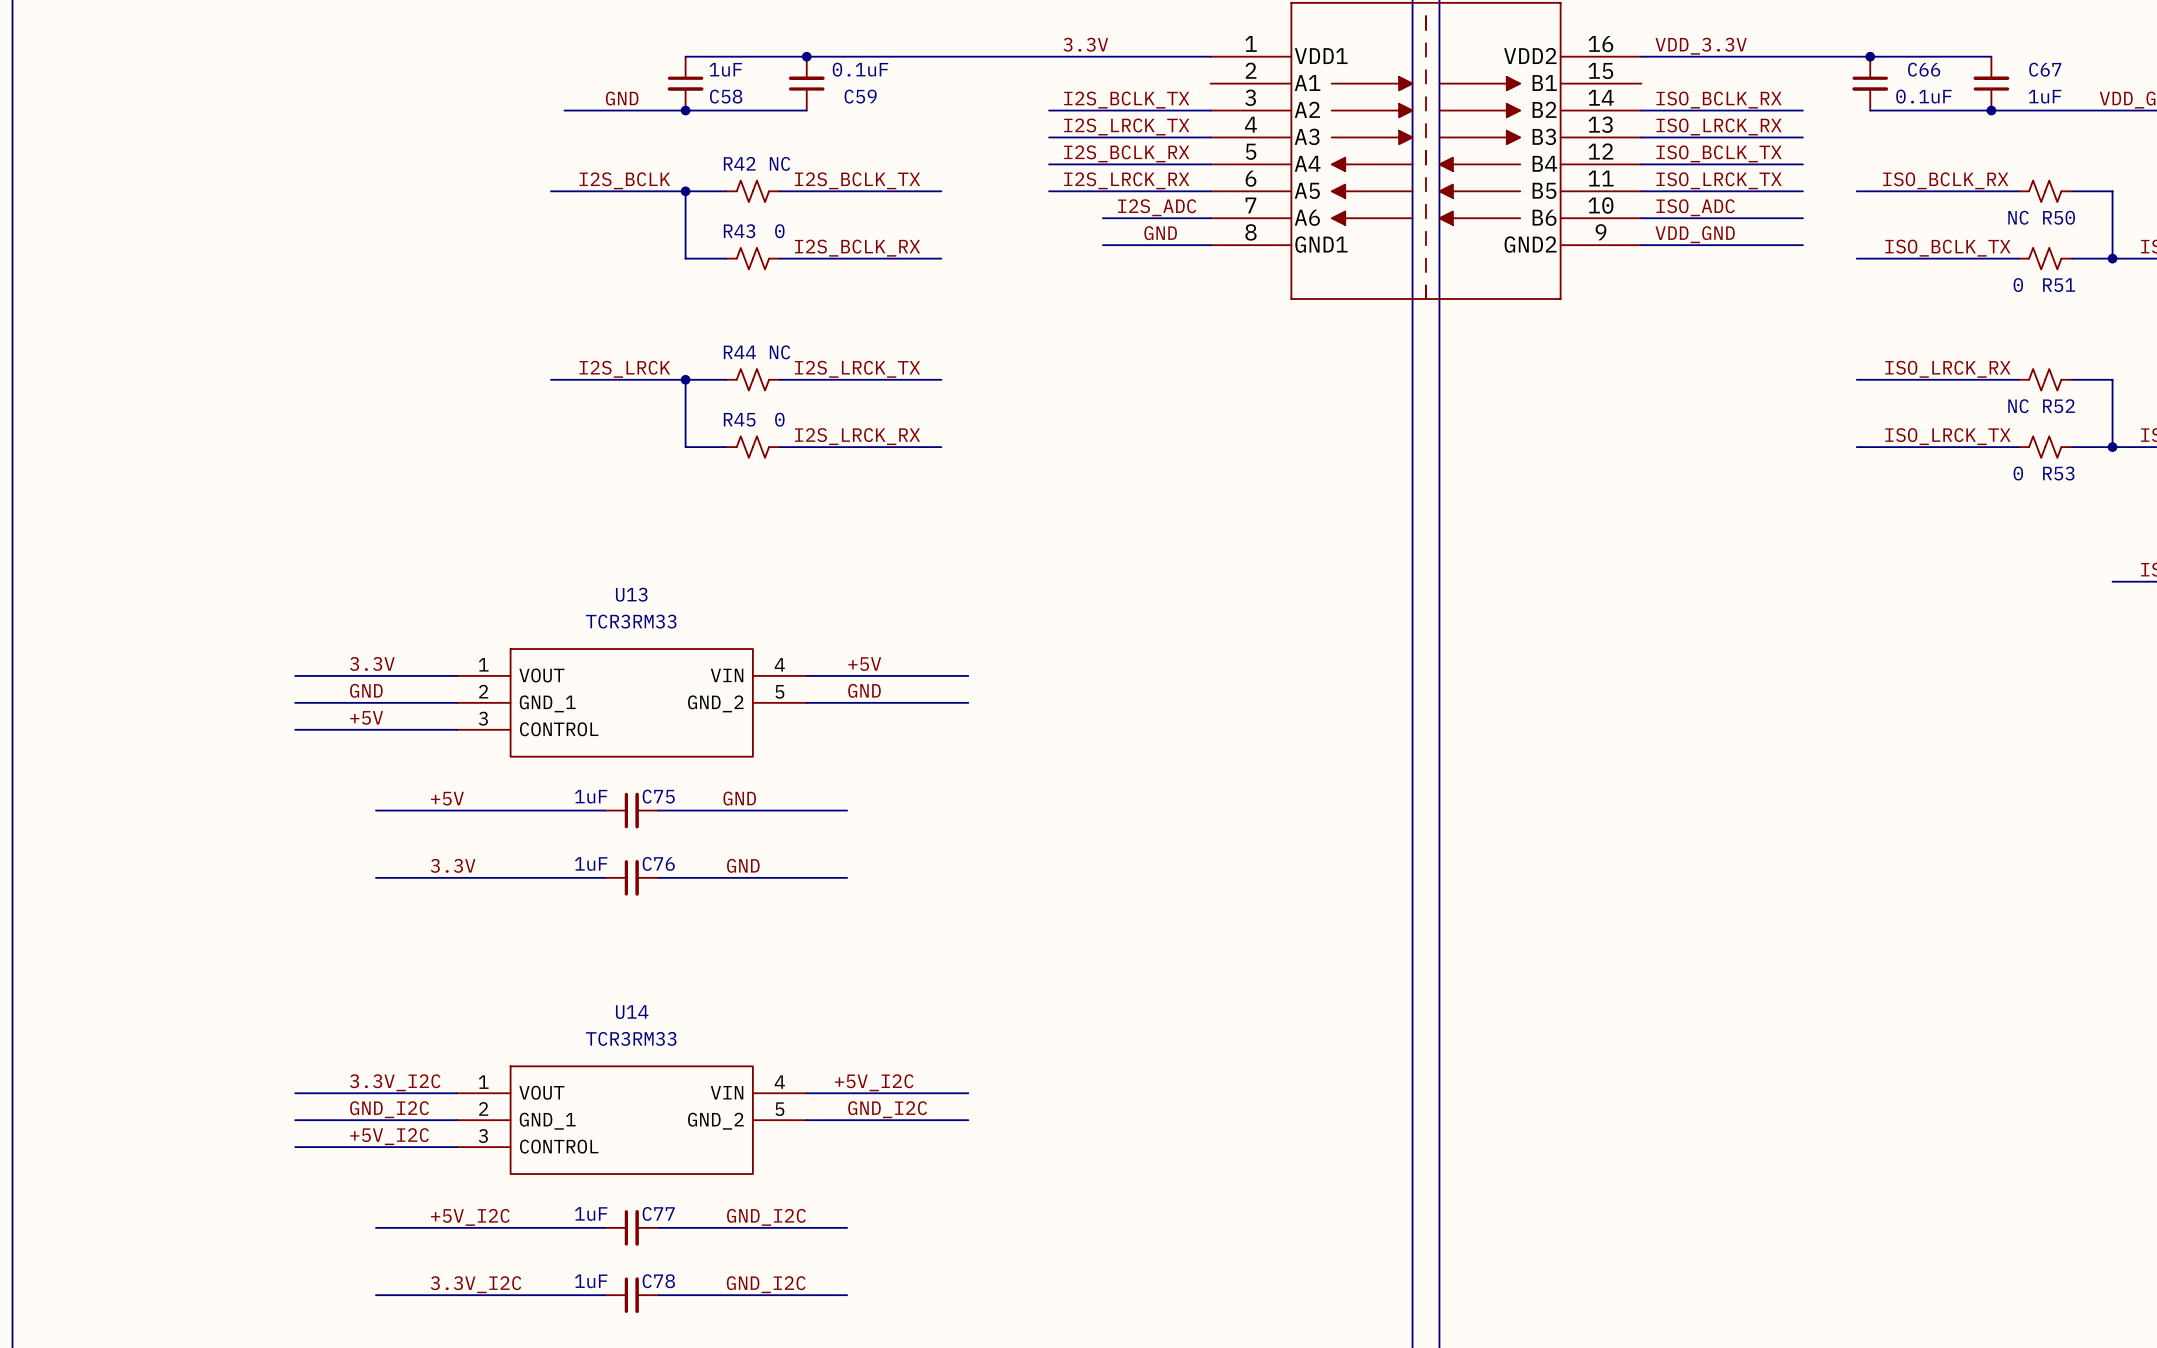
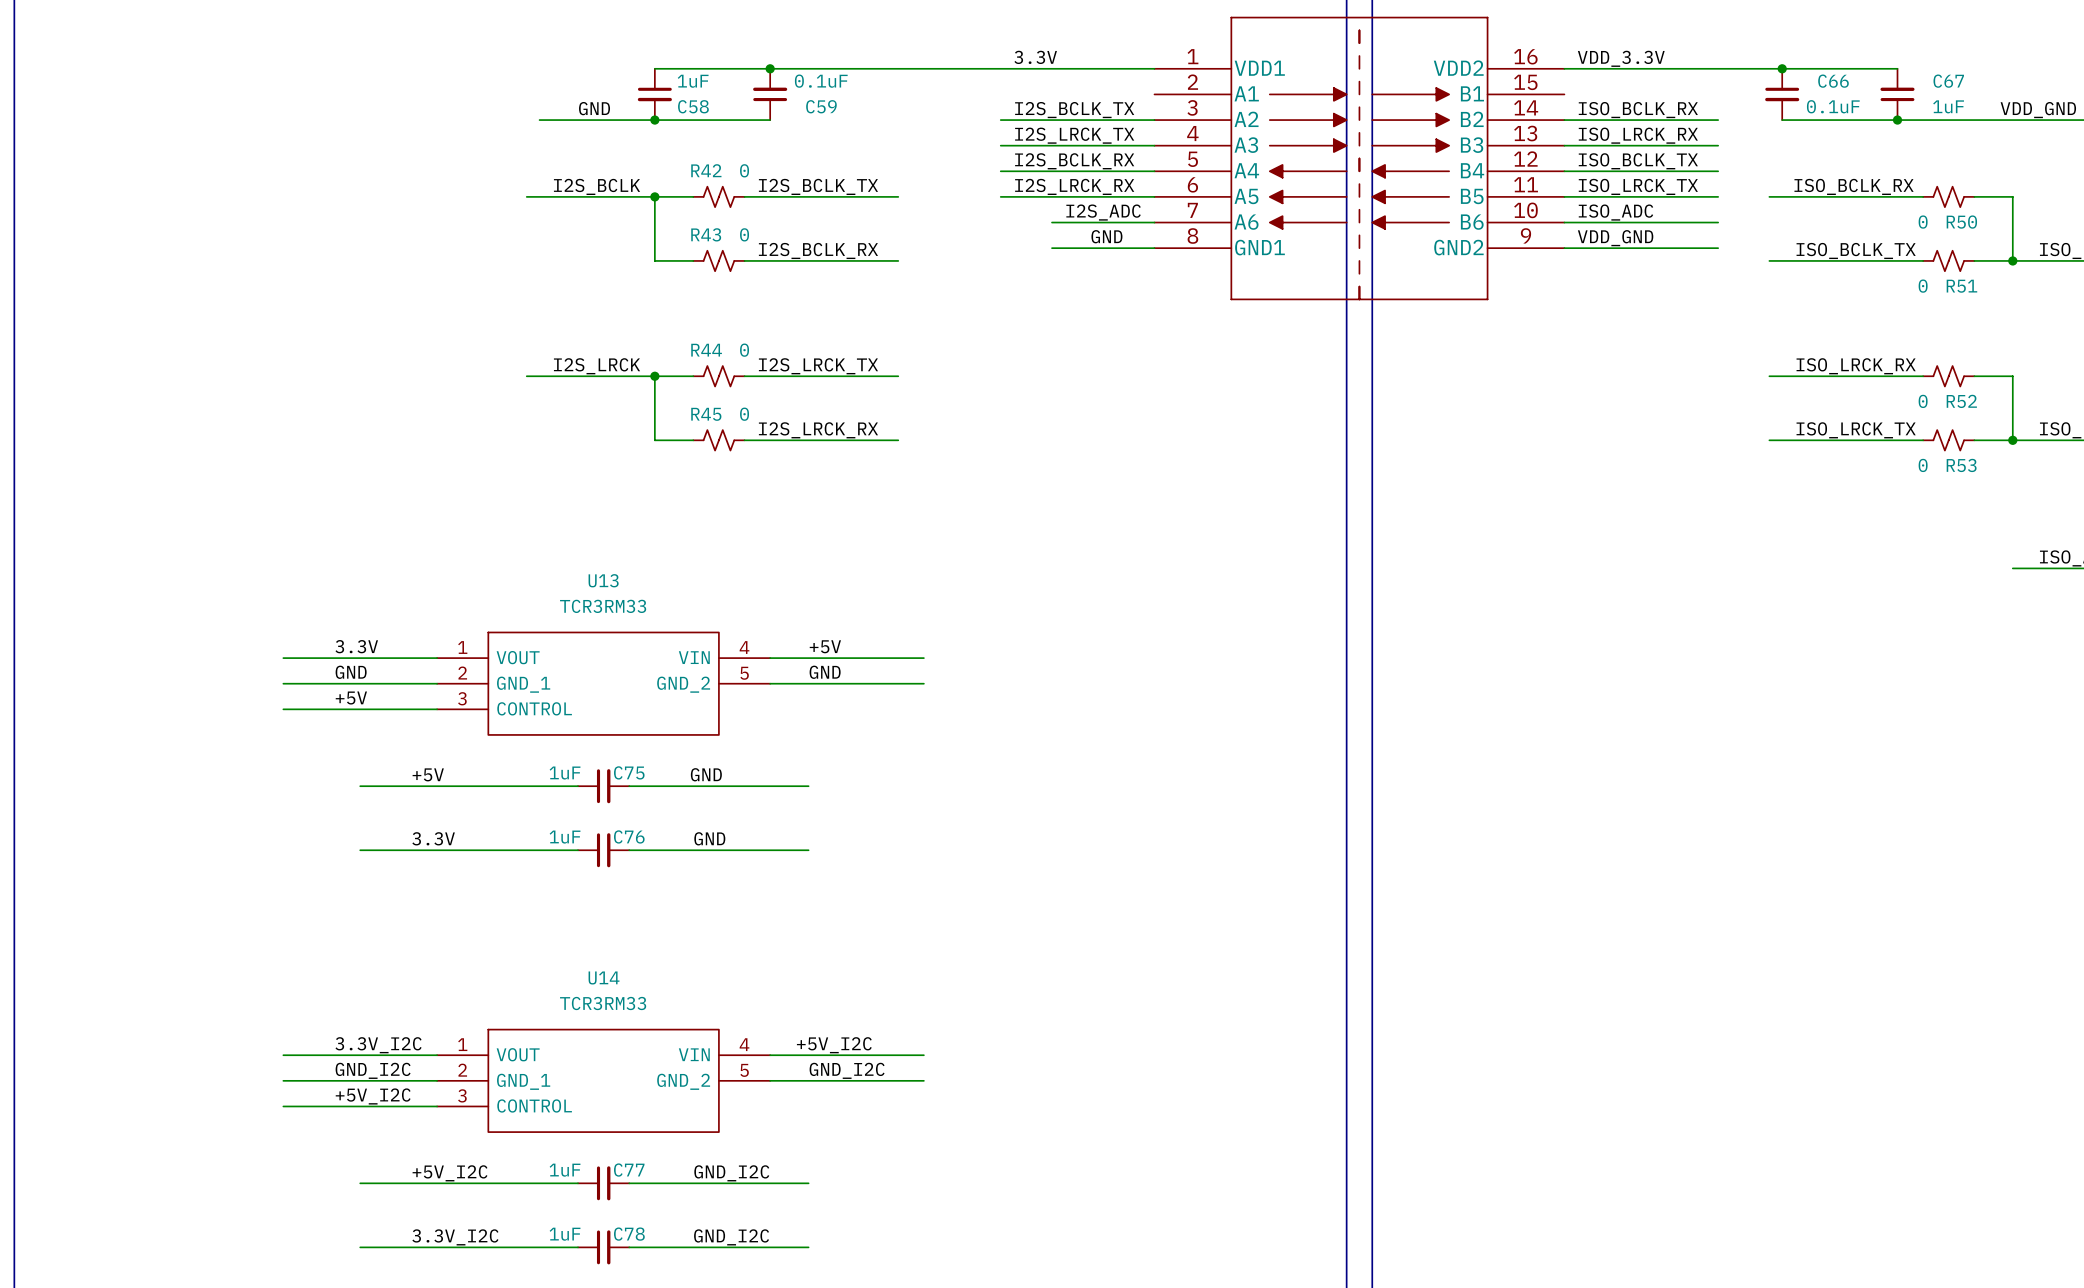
R42 value: NC (780, 163) -> 0 (744, 170)
R50 value: NC (2018, 217) -> 0 (1923, 222)
R44 value: NC (780, 352) -> 0 (744, 350)
R52 value: NC (2018, 406) -> 0 (1923, 401)

